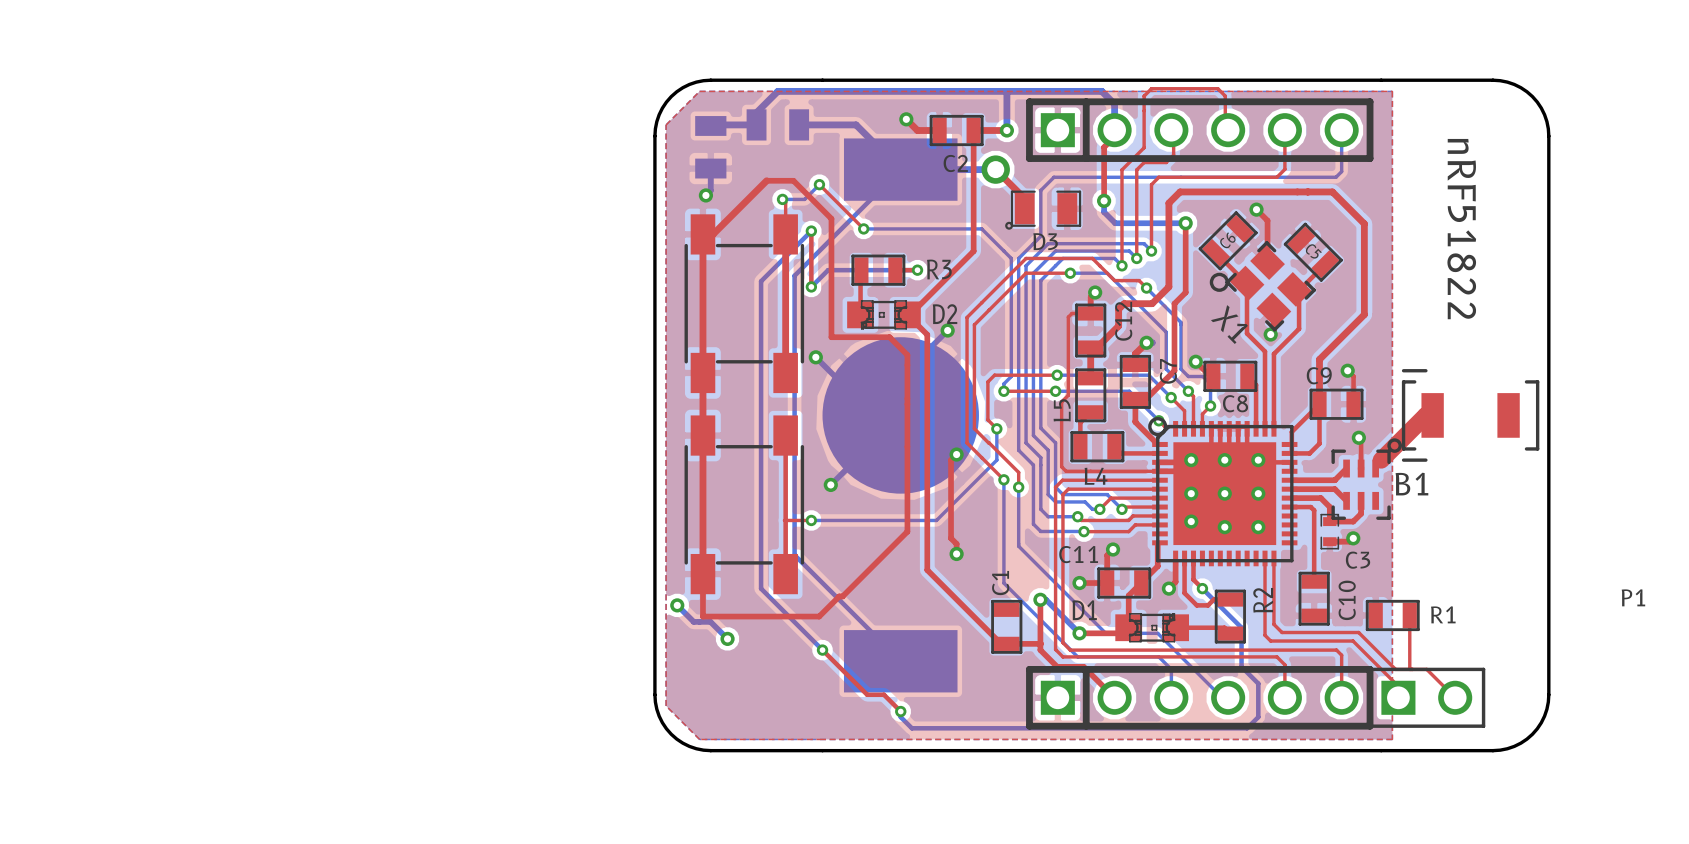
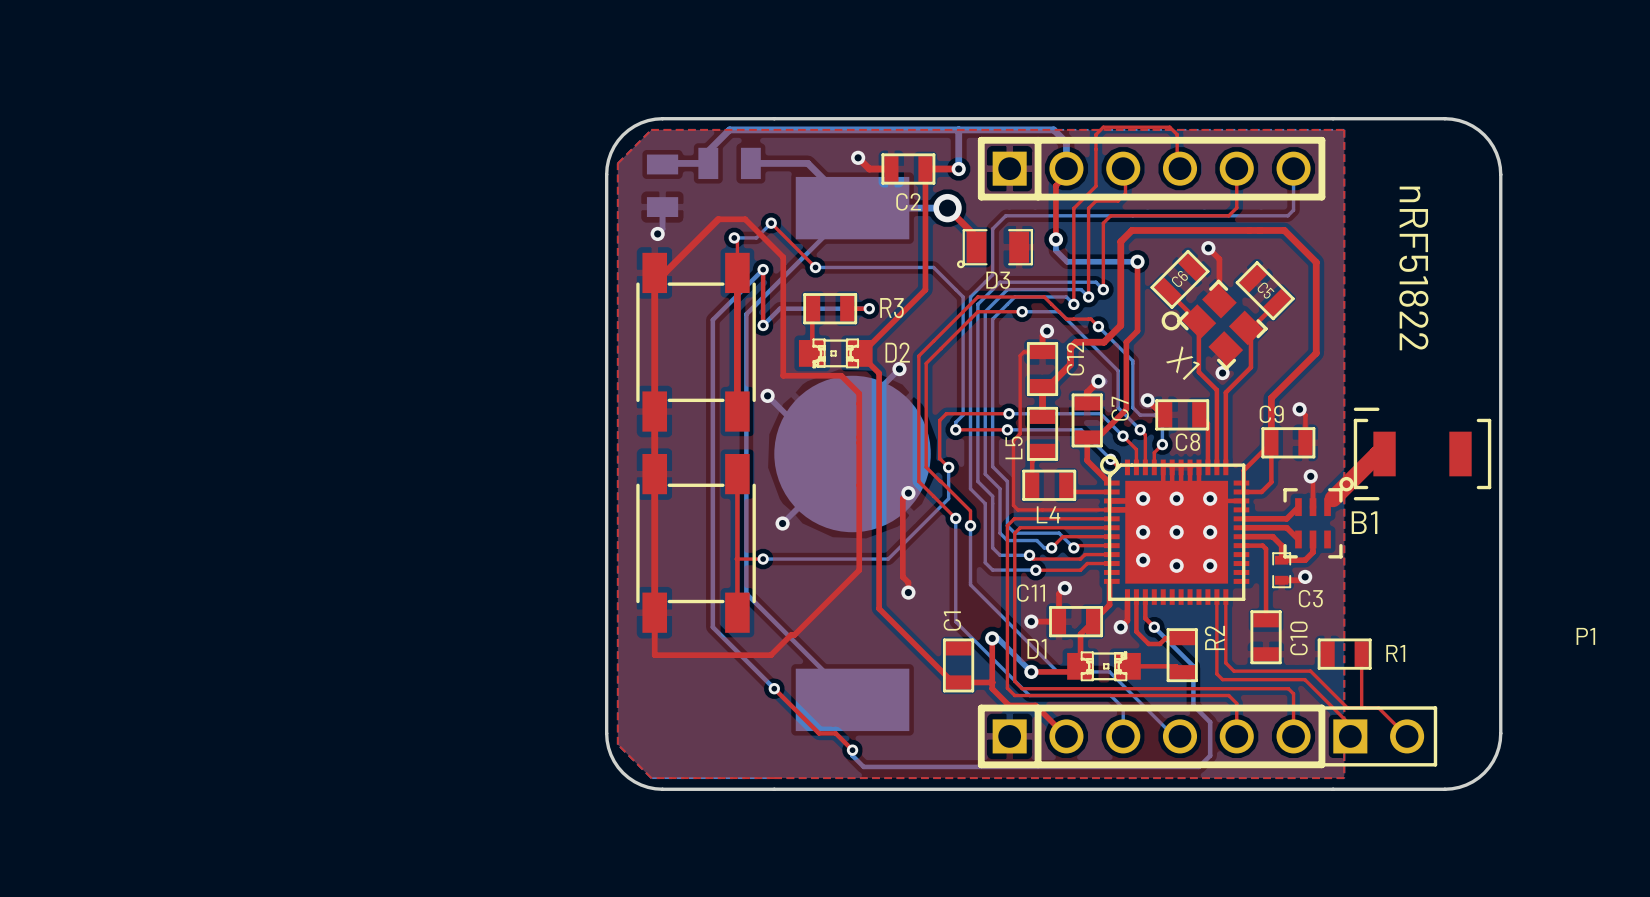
bottom track: (677, 605) (693, 621) (710, 621) (727, 638) -> none
via: (677, 605) -> none
via: (727, 638) -> none

